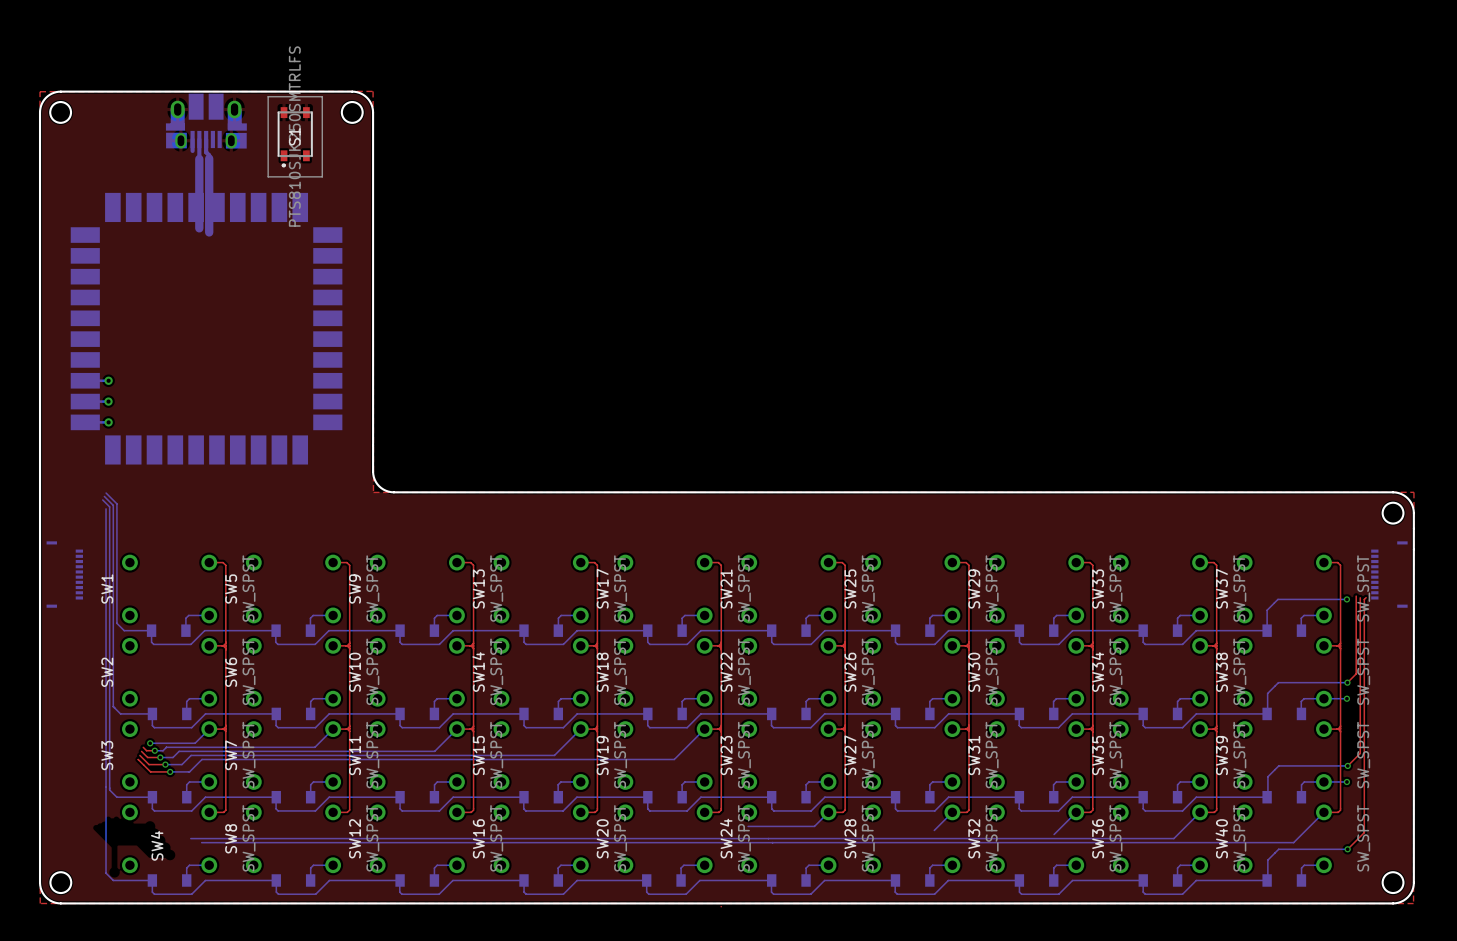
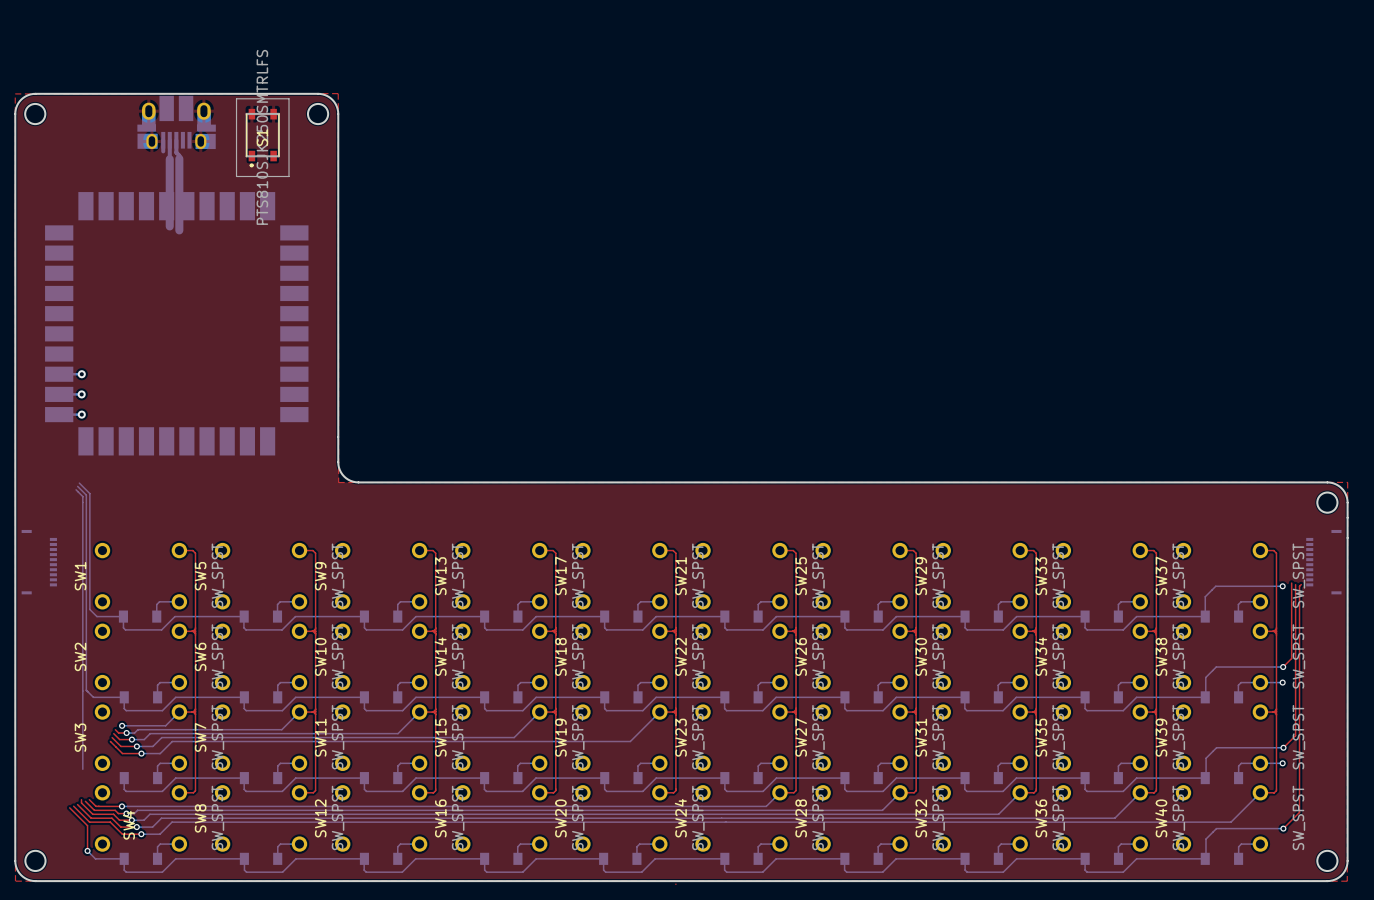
bottom track: (106, 508) (106, 873) (113, 880) (122, 880) -> (87, 850) (95, 858)
bottom track: (109, 788) (116, 797) (152, 797) -> none
top track: none -> (81, 799) (81, 802) (92, 814) (113, 814) (119, 820) (131, 820)
top track: none -> (89, 799) (96, 806) (98, 806)
top track: none -> (85, 801) (94, 810) (115, 810) (118, 813) (126, 813)
top track: none -> (77, 804) (91, 818) (111, 818) (120, 827) (136, 827)
top track: none -> (73, 806) (89, 822) (110, 822) (122, 834) (141, 834)
top track: none -> (98, 806) (121, 806)
bottom track: none -> (121, 806) (701, 806)
via: none -> (121, 806)
top track: none -> (69, 807) (87, 825) (87, 850)
bottom track: none -> (882, 810) (137, 810) (134, 813) (126, 813)
via: none -> (126, 813)
bottom track: none -> (998, 814) (149, 814) (143, 820) (131, 820)
bottom track: none -> (161, 818) (152, 827) (136, 827)
via: none -> (131, 820)
bottom track: none -> (172, 822) (159, 834) (141, 834)
via: none -> (136, 827)
via: none -> (141, 834)
via: none -> (87, 850)

